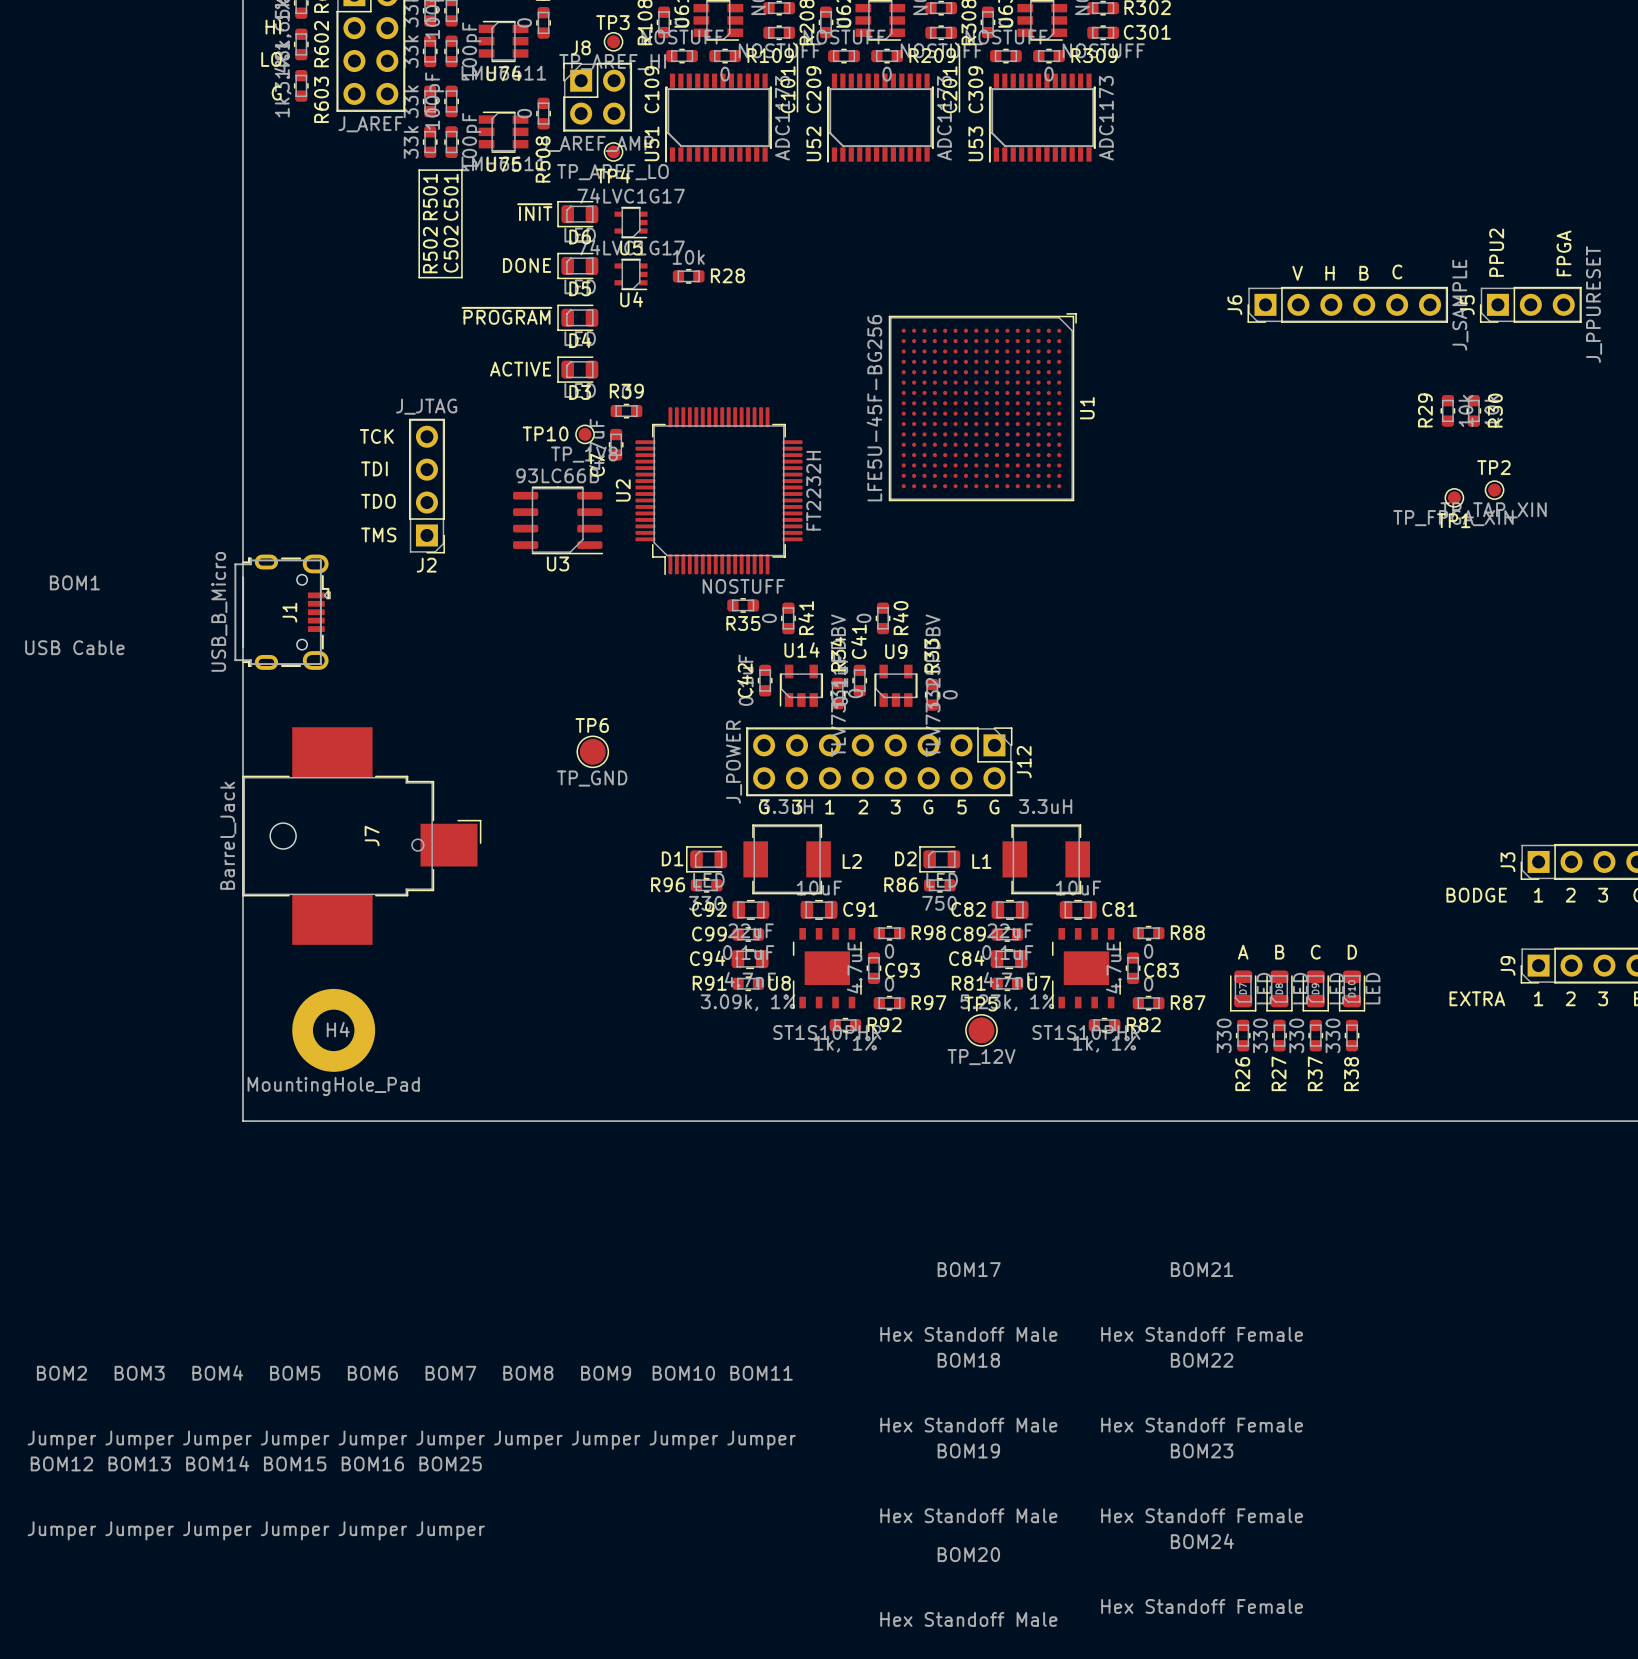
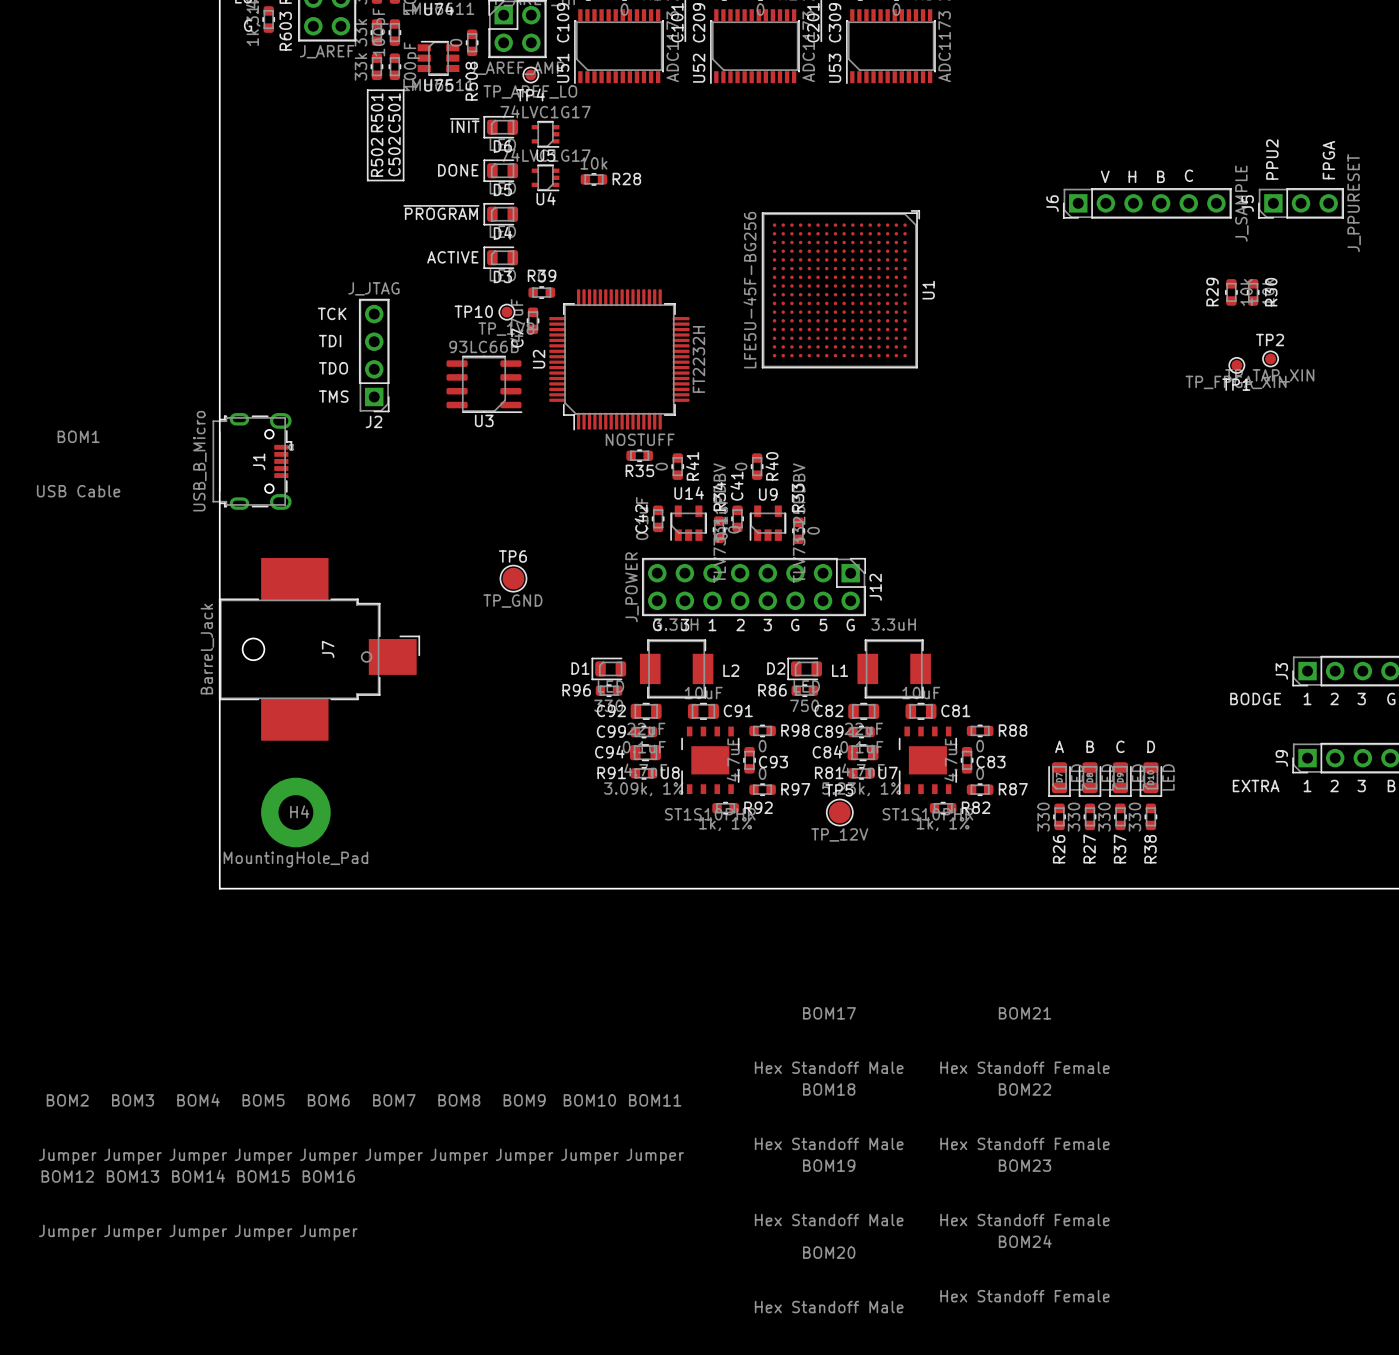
BOM25: Jumper (450, 1498) -> none

